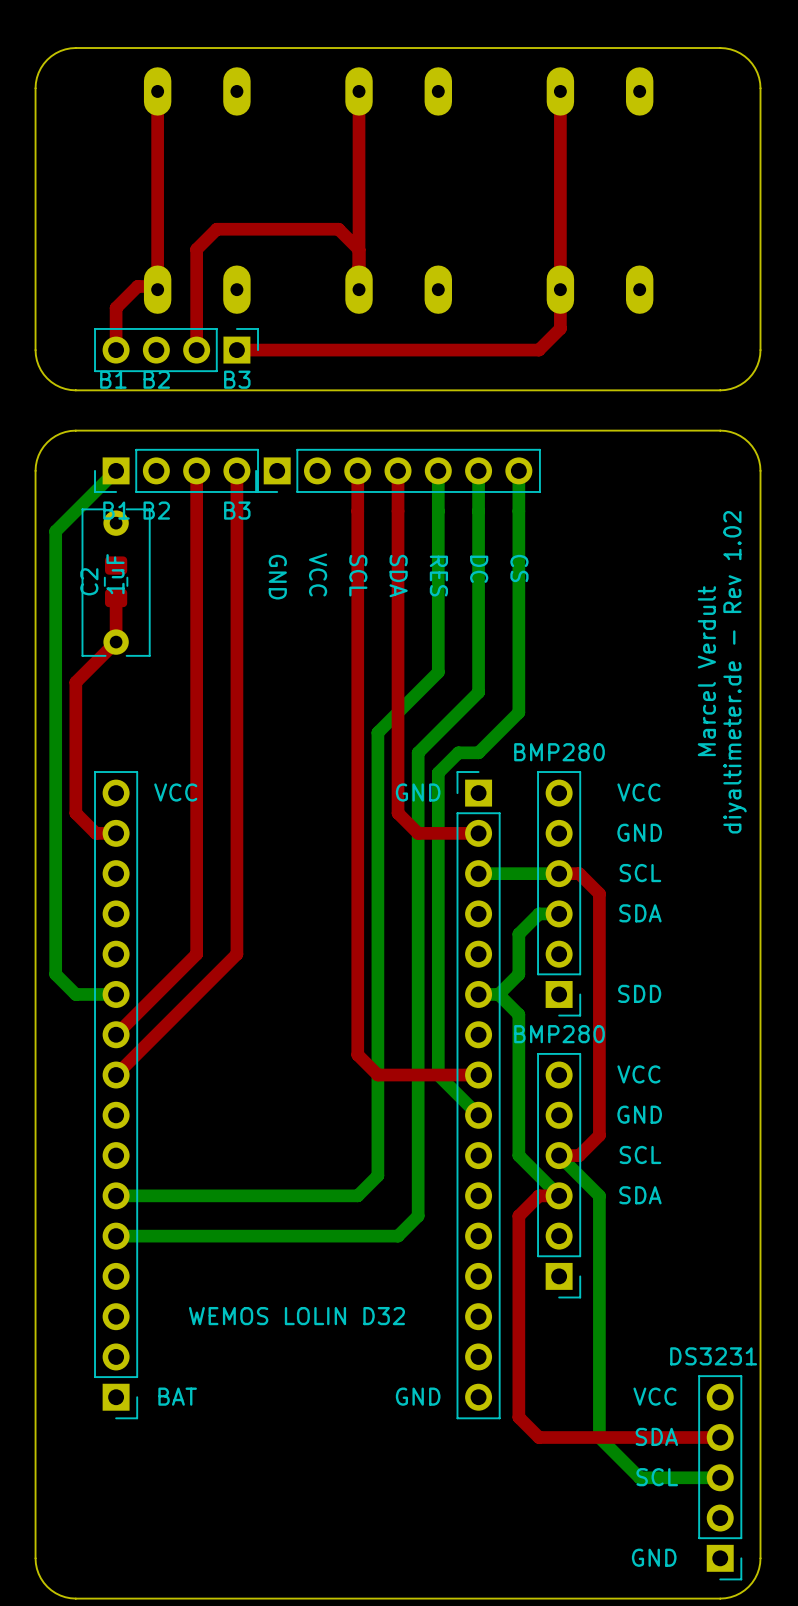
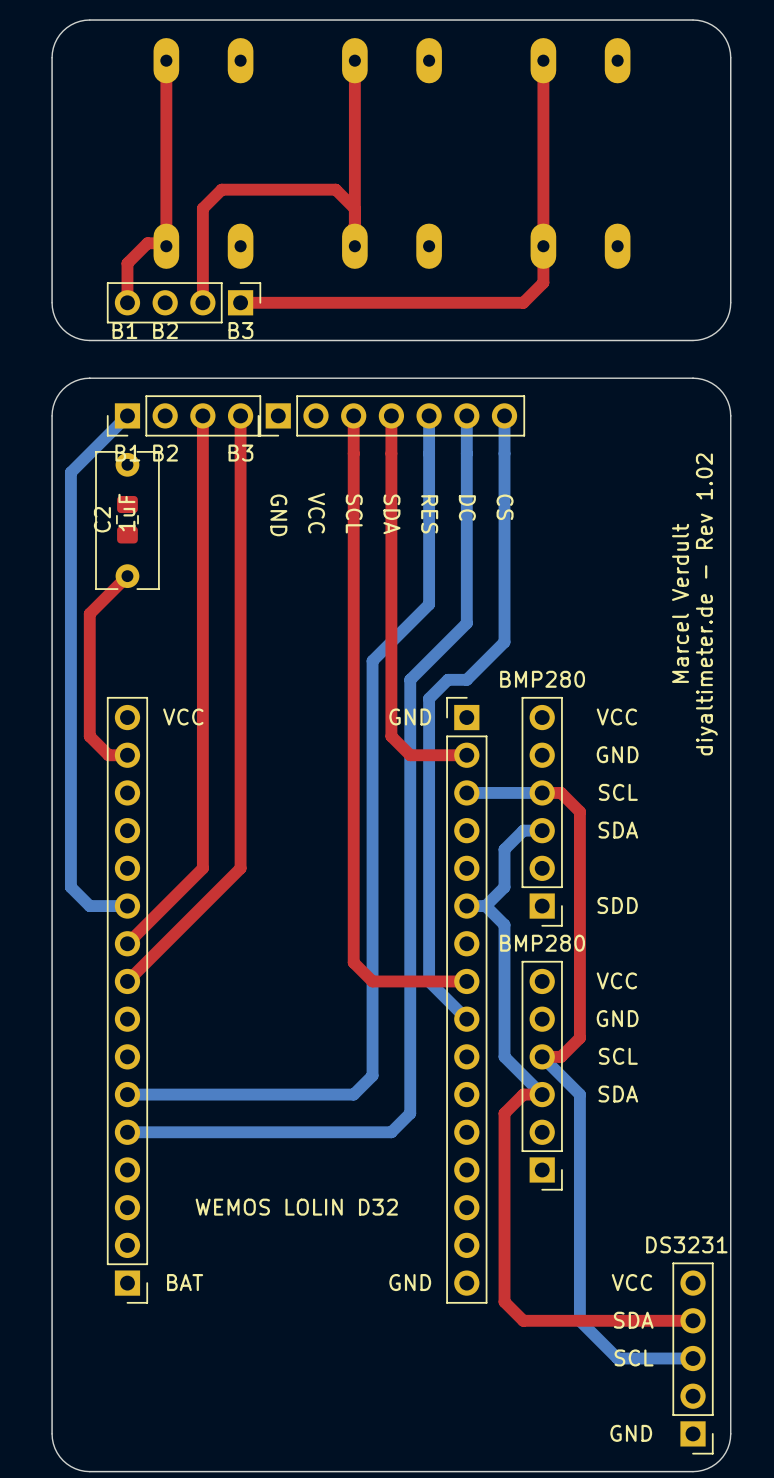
top track: (116, 598) (116, 642) -> none

